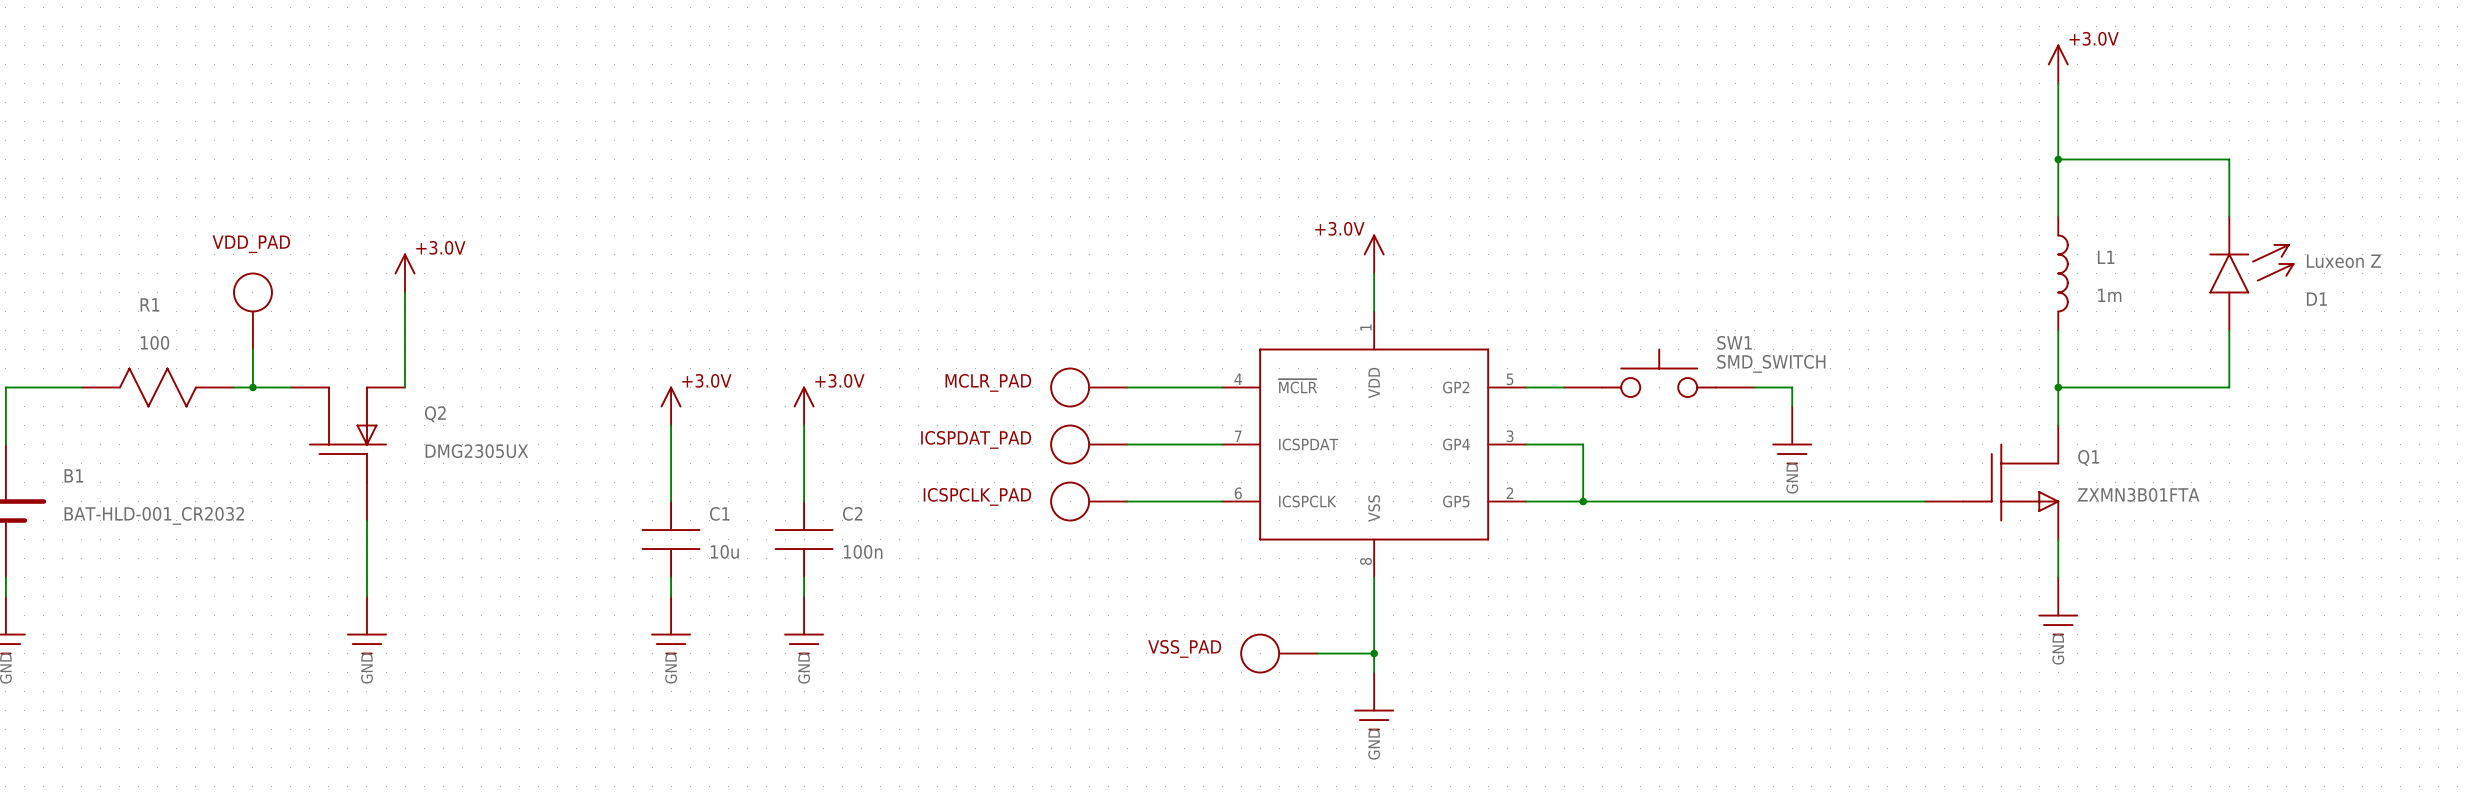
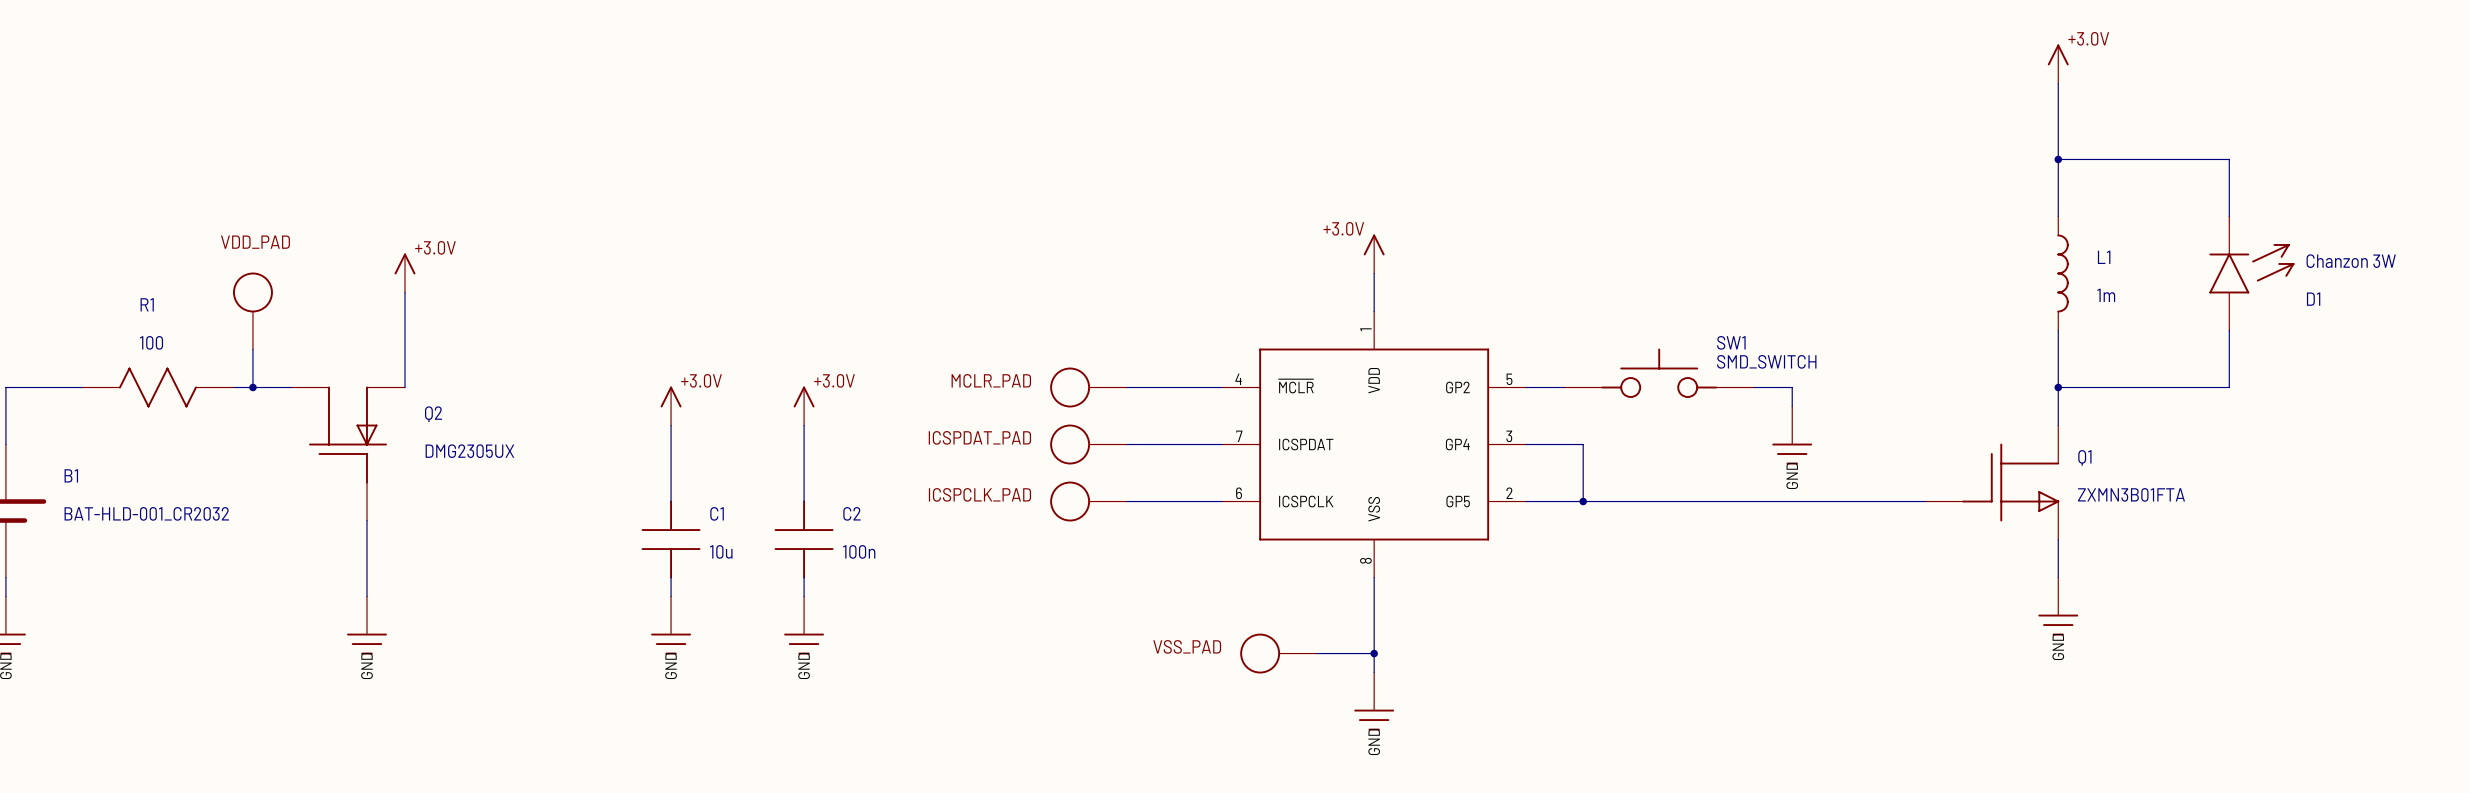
D1 value: Luxeon Z (2343, 261) -> Chanzon 3W (2351, 261)

